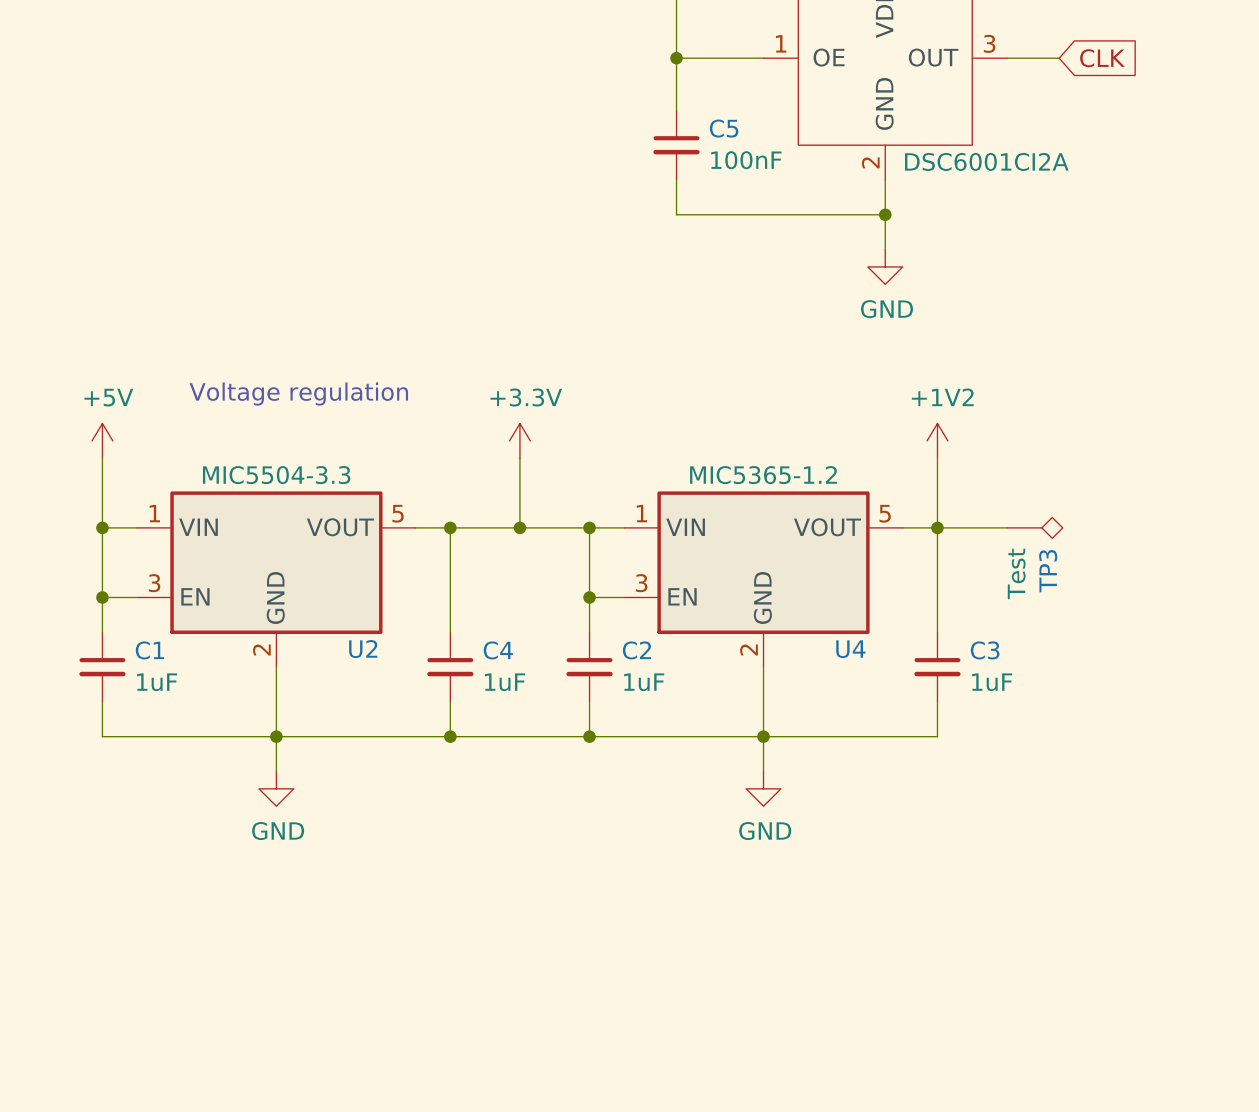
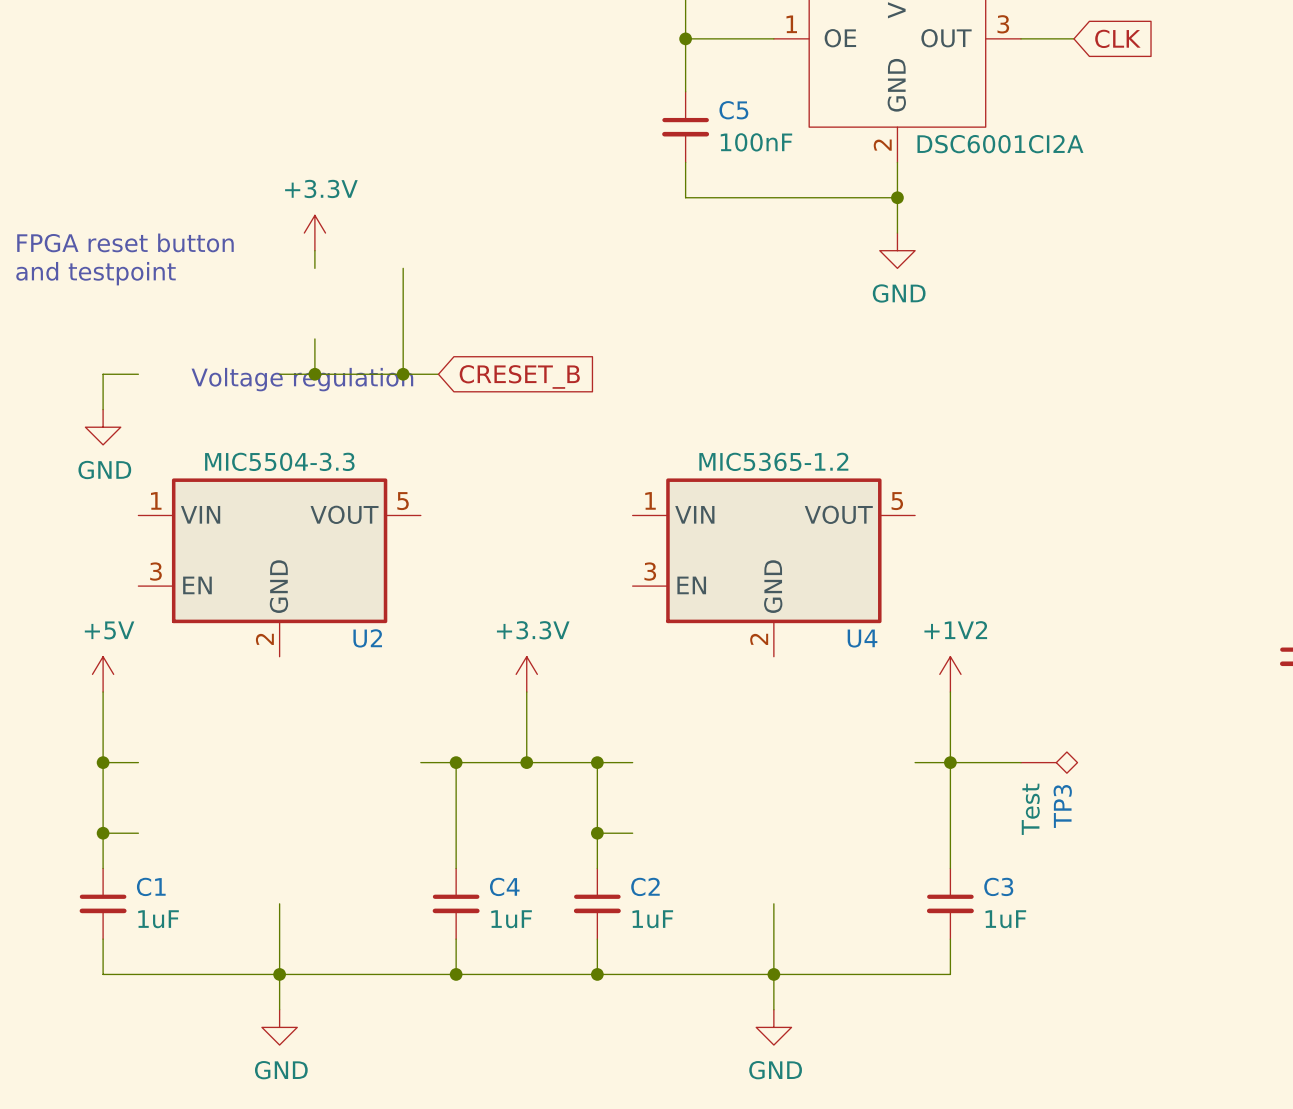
power symbol: none -> +3.3V (314, 233)
text: none -> FPGA reset button (125, 242)
wire: none -> (314, 250) (314, 268)
wire: none -> (403, 268) (403, 374)
text: none -> and testpoint (96, 273)
wire: none -> (314, 338) (314, 374)
wire: none -> (138, 374) (103, 374) (103, 409)
wire: none -> (279, 374) (438, 374)
junction: none -> (314, 374)
junction: none -> (403, 374)
global label: none -> CRESET_B (519, 376)
power symbol: +5V (102, 440) -> GND (103, 427)
power symbol: +3.3V (519, 440) -> none
power symbol position: +1V2 (937, 440) -> +1V2 (950, 674)
wire: (102, 458) (102, 632) -> none
wire: (519, 458) (519, 527) -> (526, 692) (526, 762)
wire: (937, 458) (937, 632) -> none
wire: (102, 527) (137, 527) -> (103, 762) (138, 762)
junction: (102, 527) -> none
wire: (415, 527) (624, 527) -> (420, 762) (632, 762)
wire: (450, 527) (450, 632) -> (456, 762) (456, 868)
junction: (450, 527) -> none
junction: (519, 527) -> none
wire: (589, 527) (589, 632) -> (597, 762) (597, 868)
junction: (589, 527) -> none
wire: (902, 527) (1007, 527) -> (915, 762) (1021, 762)
junction: (937, 527) -> none
TP3 position: (1034, 527) -> (1049, 762)
wire: (102, 597) (137, 597) -> (103, 833) (138, 833)
junction: (102, 597) -> none
wire: (589, 597) (624, 597) -> (597, 833) (632, 833)
junction: (589, 597) -> none
C1 position: (102, 667) -> (103, 903)
wire: (276, 667) (276, 771) -> (279, 903) (279, 1009)
C4 position: (450, 667) -> (456, 903)
C2 position: (589, 667) -> (597, 903)
wire: (763, 667) (763, 771) -> (773, 903) (773, 1009)
C3 position: (937, 667) -> (950, 903)
power symbol: none -> +5V (103, 674)
power symbol: none -> +3.3V (526, 674)
wire: (450, 701) (450, 736) -> (456, 939) (456, 974)
wire: (589, 701) (589, 736) -> (597, 939) (597, 974)
wire: (102, 736) (937, 736) -> (103, 727) (103, 868)
junction: (276, 736) -> none
junction position: (450, 736) -> (456, 762)
junction position: (589, 736) -> (597, 762)
junction: (763, 736) -> none
wire: none -> (950, 727) (950, 868)
junction: none -> (103, 762)
junction: none -> (526, 762)
junction: none -> (950, 762)
power symbol position: GND (276, 788) -> GND (279, 1027)
power symbol position: GND (763, 788) -> GND (773, 1027)
junction: none -> (103, 833)
junction: none -> (597, 833)
wire: none -> (103, 939) (103, 974) (950, 974) (950, 939)
junction: none -> (279, 974)
junction: none -> (456, 974)
junction: none -> (597, 974)
junction: none -> (773, 974)

